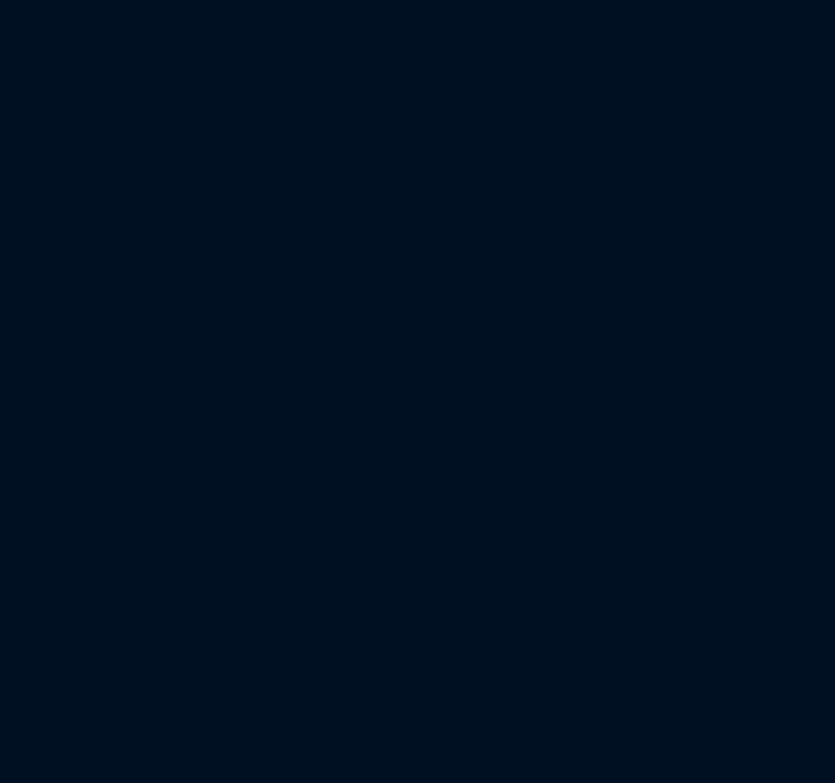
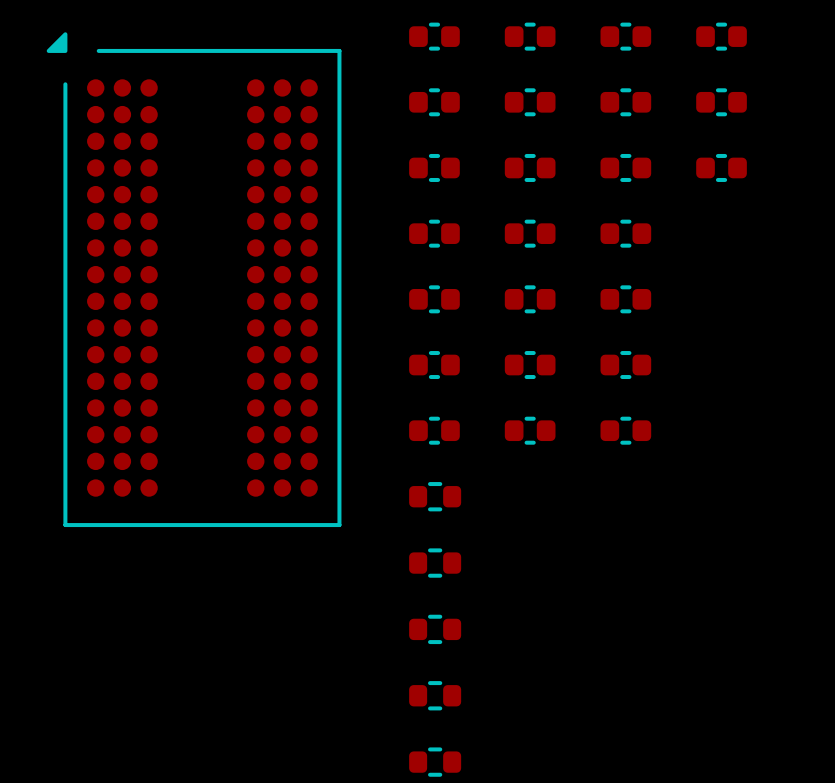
part: none -> (434, 36)
part: none -> (530, 36)
part: none -> (625, 36)
part: none -> (721, 36)
part: none -> (434, 102)
part: none -> (530, 102)
part: none -> (625, 102)
part: none -> (721, 102)
part: none -> (434, 167)
part: none -> (530, 167)
part: none -> (625, 167)
part: none -> (721, 167)
part: none -> (434, 233)
part: none -> (530, 233)
part: none -> (625, 233)
part: none -> (194, 279)
part: none -> (434, 299)
part: none -> (530, 299)
part: none -> (625, 299)
part: none -> (434, 365)
part: none -> (530, 365)
part: none -> (625, 365)
part: none -> (434, 430)
part: none -> (530, 430)
part: none -> (625, 430)
part: none -> (435, 496)
part: none -> (435, 563)
part: none -> (435, 629)
part: none -> (435, 695)
part: none -> (435, 762)

